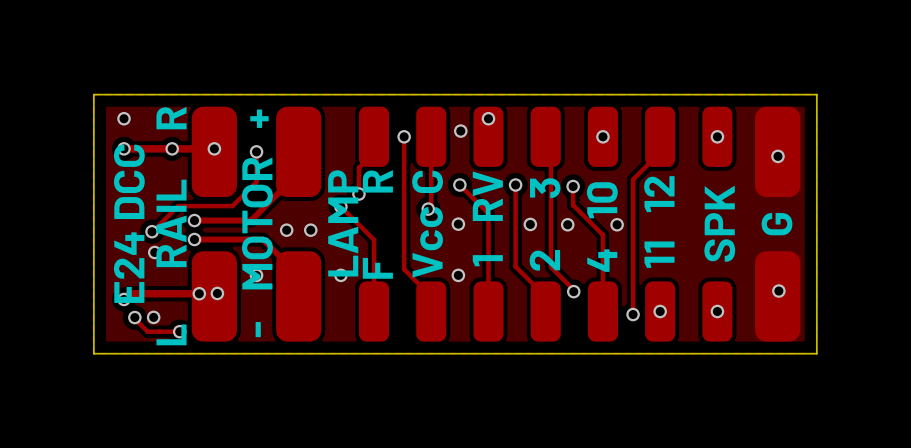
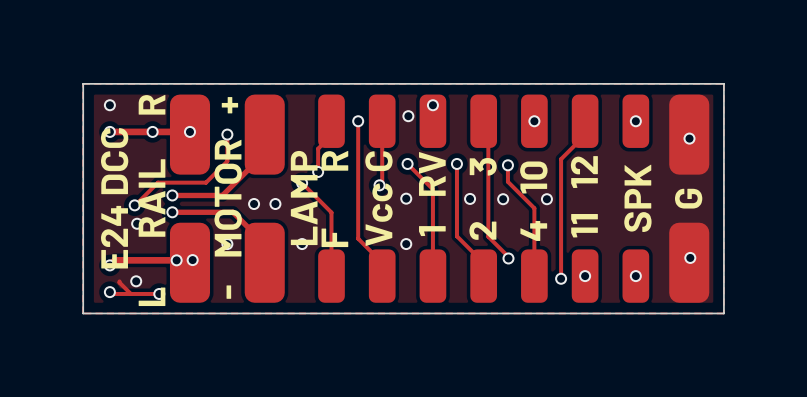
via position: (134, 317) -> (109, 292)

